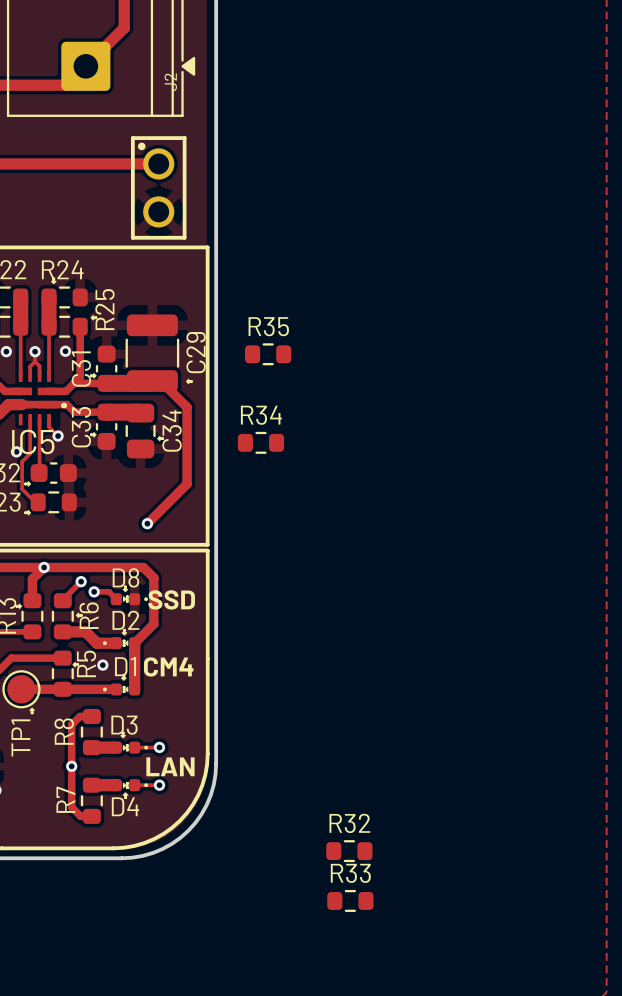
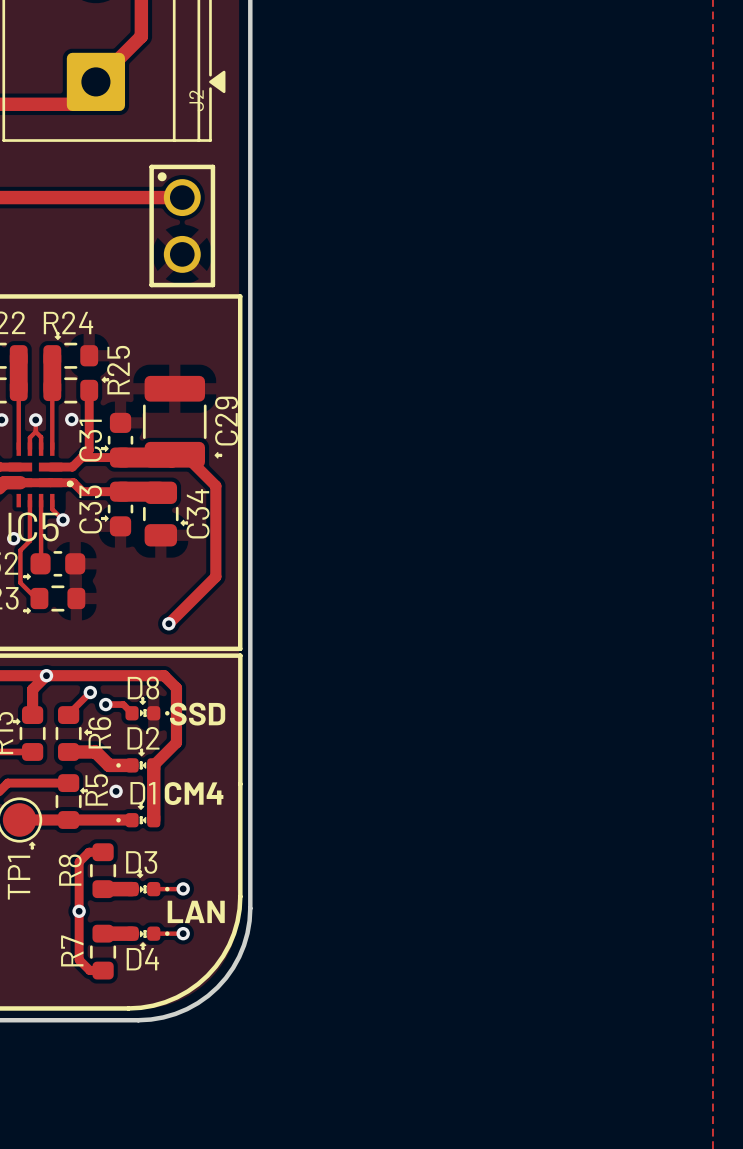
R35: (268, 354) -> none
R34: (260, 442) -> none
R32: (349, 851) -> none
R33: (350, 900) -> none

